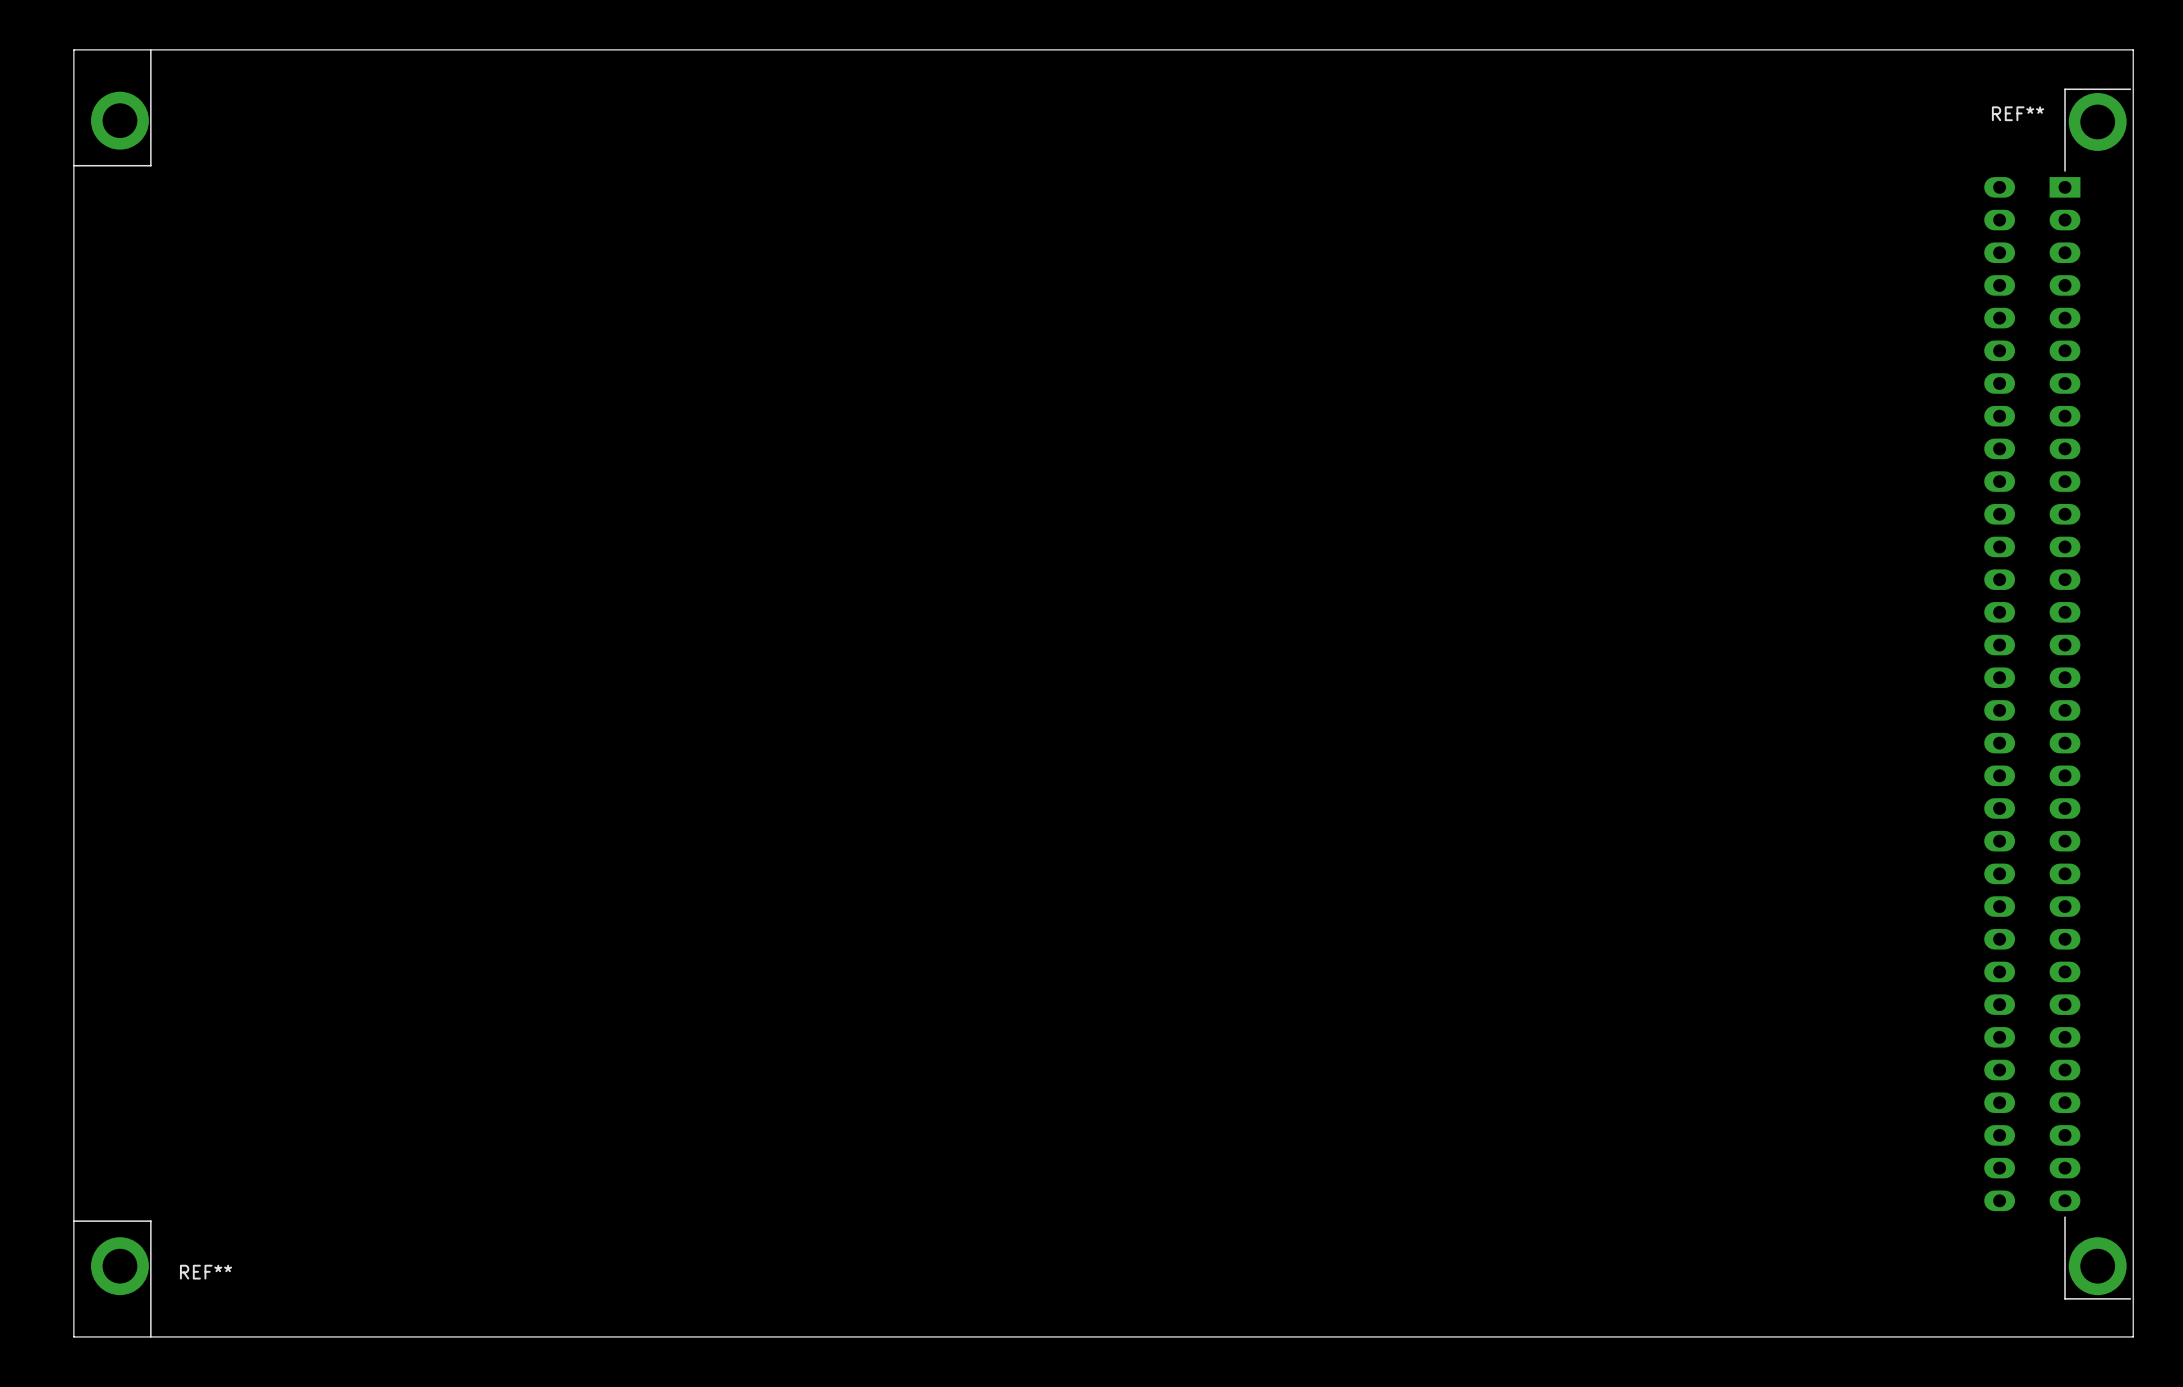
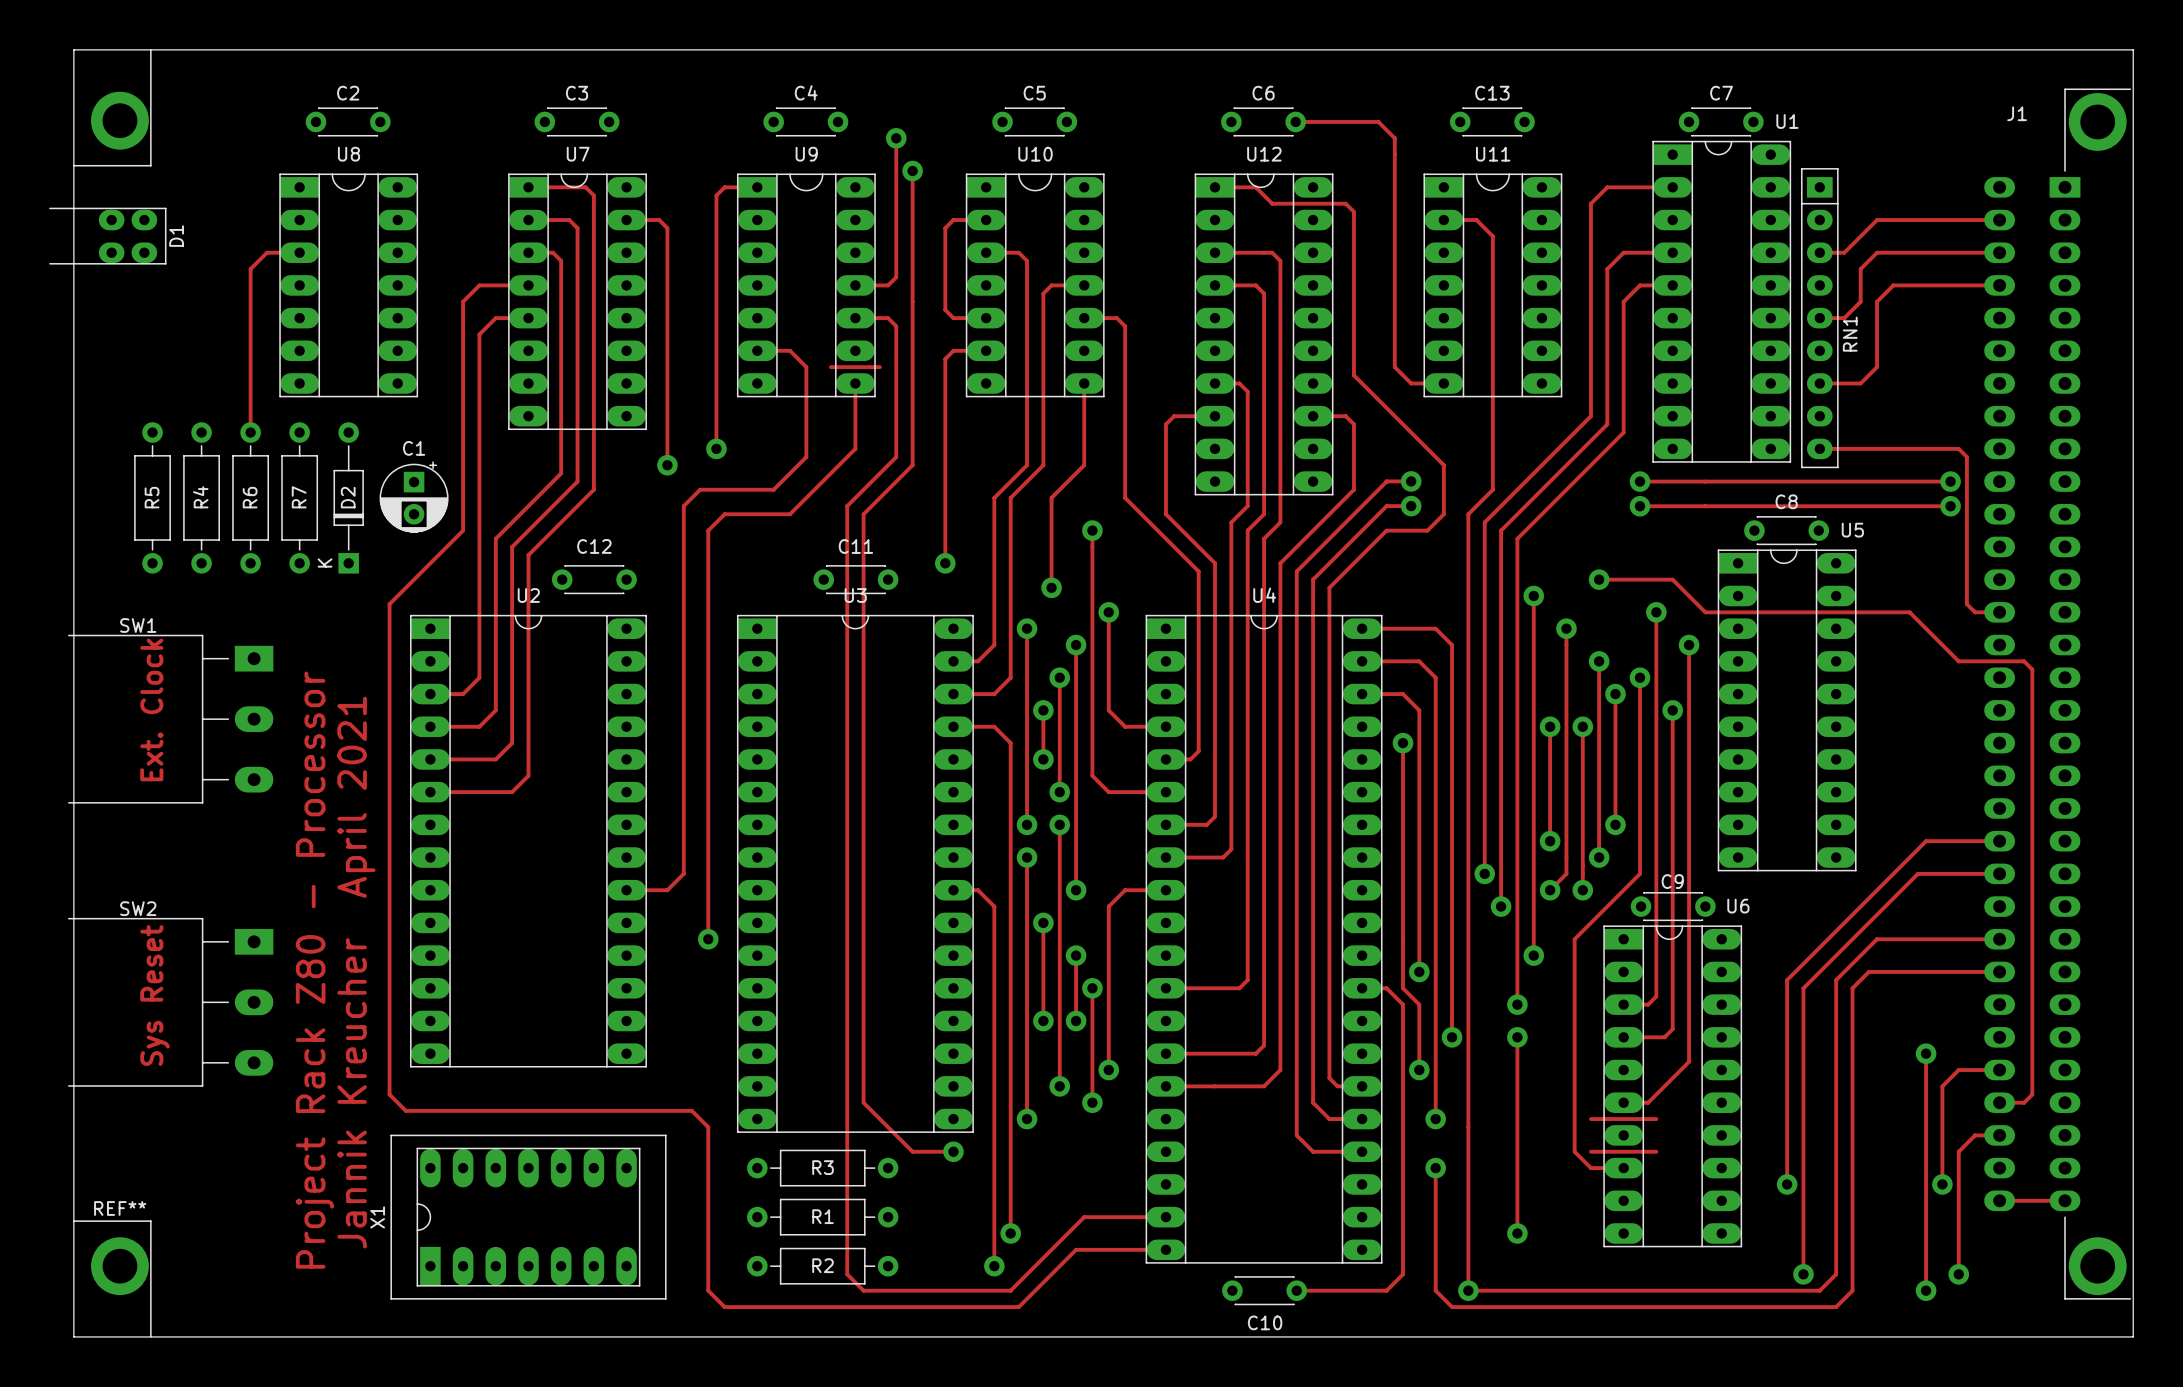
REF** name: REF** (2017, 113) -> J1 (2017, 113)
C2: none -> (348, 121)
C3: none -> (577, 121)
C4: none -> (805, 121)
C5: none -> (1034, 121)
C6: none -> (1263, 121)
track: none -> (1295, 121) (1378, 121) (1394, 138) (1394, 367) (1411, 383) (1443, 383)
C13: none -> (1492, 121)
C7: none -> (1721, 121)
track: none -> (896, 138) (896, 277) (888, 285) (855, 285)
via: none -> (896, 138)
track: none -> (912, 171) (912, 465) (863, 514) (863, 1102) (912, 1151) (953, 1151)
via: none -> (912, 171)
track: none -> (528, 187) (585, 187) (593, 195) (593, 489) (528, 555) (528, 775) (512, 792) (430, 792)
track: none -> (757, 187) (724, 187) (716, 195) (716, 448)
track: none -> (1215, 187) (1255, 187) (1272, 203) (1345, 203) (1353, 211) (1353, 375) (1443, 465) (1443, 514) (1427, 530) (1386, 530) (1329, 587) (1329, 1078) (1337, 1086) (1362, 1086)
track: none -> (1672, 187) (1607, 187) (1590, 203) (1590, 416) (1484, 522) (1484, 873)
track: none -> (528, 220) (569, 220) (577, 228) (577, 481) (512, 546) (512, 743) (495, 759) (430, 759)
track: none -> (626, 220) (659, 220) (667, 228) (667, 465)
track: none -> (986, 220) (953, 220) (945, 228) (945, 309) (953, 318) (986, 318)
track: none -> (1443, 220) (1476, 220) (1492, 236) (1492, 489) (1468, 514) (1468, 1290) (1819, 1290) (1836, 1274) (1836, 980) (1877, 939) (1999, 939)
track: none -> (1999, 220) (1877, 220) (1844, 252) (1819, 252)
D1: none -> (107, 236)
track: none -> (299, 252) (266, 252) (250, 269) (250, 432)
track: none -> (528, 252) (553, 252) (561, 260) (561, 473) (495, 538) (495, 710) (479, 726) (430, 726)
track: none -> (986, 252) (1018, 252) (1027, 260) (1027, 465) (994, 497) (994, 645) (978, 661) (953, 661)
track: none -> (1215, 252) (1272, 252) (1280, 260) (1280, 522) (1264, 538) (1264, 1045) (1255, 1053) (1165, 1053)
track: none -> (1672, 252) (1623, 252) (1607, 269) (1607, 424) (1501, 530) (1501, 906)
track: none -> (1999, 252) (1877, 252) (1860, 269) (1860, 301) (1844, 318) (1811, 318)
U8: none -> (348, 285)
track: none -> (528, 285) (479, 285) (463, 301) (463, 530) (389, 604) (389, 1094) (405, 1110) (691, 1110) (708, 1127) (708, 1290) (724, 1307) (1018, 1307) (1076, 1249) (1165, 1249)
U9: none -> (806, 285)
U10: none -> (1035, 285)
track: none -> (1084, 285) (1051, 285) (1043, 293) (1043, 465) (1010, 497) (1010, 677) (994, 694) (953, 694)
track: none -> (1215, 285) (1255, 285) (1264, 293) (1264, 514) (1247, 530) (1247, 980) (1239, 988) (1165, 988)
U11: none -> (1492, 285)
track: none -> (1672, 285) (1640, 285) (1623, 301) (1623, 432) (1517, 538) (1517, 1004)
track: none -> (1999, 285) (1893, 285) (1877, 301) (1877, 367) (1860, 383) (1819, 383)
U7: none -> (577, 301)
U1: none -> (1721, 301)
track: none -> (528, 318) (495, 318) (479, 334) (479, 677) (463, 694) (430, 694)
track: none -> (855, 318) (888, 318) (896, 326) (896, 457) (847, 506) (847, 1274) (863, 1290) (1010, 1290) (1084, 1217) (1165, 1217)
track: none -> (1084, 318) (1116, 318) (1125, 326) (1125, 497) (1198, 571) (1198, 751) (1190, 759) (1165, 759)
RN1: none -> (1819, 318)
U12: none -> (1264, 334)
track: none -> (757, 350) (790, 350) (806, 367) (806, 457) (773, 489) (700, 489) (683, 506) (683, 873) (667, 890) (626, 890)
track: none -> (986, 350) (953, 350) (945, 358) (945, 563)
track: none -> (830, 367) (879, 367)
track: none -> (855, 383) (855, 448) (790, 514) (724, 514) (708, 530) (708, 939)
track: none -> (1084, 383) (1084, 465) (1051, 497) (1051, 587)
track: none -> (1215, 383) (1239, 383) (1247, 391) (1247, 506) (1231, 522) (1231, 849) (1223, 857) (1165, 857)
track: none -> (1215, 416) (1174, 416) (1165, 424) (1165, 514) (1215, 563) (1215, 816) (1206, 824) (1165, 824)
track: none -> (1313, 416) (1345, 416) (1353, 424) (1353, 489) (1280, 563) (1280, 1070) (1264, 1086) (1165, 1086)
via: none -> (716, 448)
track: none -> (1819, 448) (1958, 448) (1966, 457) (1966, 604) (1975, 612) (1999, 612)
via: none -> (667, 465)
track: none -> (1411, 481) (1386, 481) (1296, 571) (1296, 1135) (1313, 1151) (1362, 1151)
via: none -> (1411, 481)
track: none -> (1640, 481) (1950, 481)
via: none -> (1640, 481)
via: none -> (1950, 481)
C1: none -> (414, 496)
R5: none -> (152, 497)
R4: none -> (201, 497)
R6: none -> (250, 497)
R7: none -> (299, 497)
D2: none -> (348, 497)
track: none -> (1411, 506) (1386, 506) (1313, 579) (1313, 1102) (1329, 1119) (1362, 1119)
via: none -> (1411, 506)
track: none -> (1640, 506) (1950, 506)
via: none -> (1640, 506)
via: none -> (1950, 506)
track: none -> (1092, 530) (1092, 775) (1108, 792) (1165, 792)
via: none -> (1092, 530)
C8: none -> (1786, 530)
via: none -> (945, 563)
C12: none -> (594, 579)
C11: none -> (855, 579)
track: none -> (1599, 579) (1672, 579) (1705, 612) (1909, 612) (1958, 661) (2024, 661) (2032, 669) (2032, 1094) (2024, 1102) (1999, 1102)
via: none -> (1599, 579)
via: none -> (1051, 587)
track: none -> (1533, 595) (1533, 955)
via: none -> (1533, 595)
track: none -> (1108, 612) (1108, 710) (1125, 726) (1165, 726)
via: none -> (1108, 612)
track: none -> (1656, 612) (1656, 996) (1648, 1004) (1623, 1004)
via: none -> (1656, 612)
track: none -> (1027, 628) (1027, 824)
via: none -> (1027, 628)
track: none -> (1362, 628) (1435, 628) (1452, 645) (1452, 1037)
track: none -> (1566, 628) (1566, 873) (1550, 890)
via: none -> (1566, 628)
track: none -> (1076, 645) (1076, 890)
via: none -> (1076, 645)
track: none -> (1689, 645) (1689, 1061) (1648, 1102) (1623, 1102)
via: none -> (1689, 645)
track: none -> (1362, 661) (1419, 661) (1435, 677) (1435, 1119)
track: none -> (1599, 661) (1599, 857)
via: none -> (1599, 661)
track: none -> (1059, 677) (1059, 792)
via: none -> (1059, 677)
track: none -> (1640, 677) (1640, 873) (1574, 939) (1574, 1151) (1590, 1168) (1623, 1168)
via: none -> (1640, 677)
track: none -> (1362, 694) (1402, 694) (1419, 710) (1419, 971)
track: none -> (1615, 694) (1615, 824)
via: none -> (1615, 694)
text: none -> Ext. Clock (151, 709)
track: none -> (1043, 710) (1043, 759)
via: none -> (1043, 710)
track: none -> (1672, 710) (1672, 1029) (1664, 1037) (1623, 1037)
via: none -> (1672, 710)
U5: none -> (1787, 710)
SW1: none -> (170, 719)
track: none -> (953, 726) (994, 726) (1010, 743) (1010, 1233)
track: none -> (1550, 726) (1550, 841)
via: none -> (1550, 726)
track: none -> (1582, 726) (1582, 890)
via: none -> (1582, 726)
track: none -> (1402, 743) (1402, 988) (1419, 1004) (1419, 1070)
via: none -> (1402, 743)
via: none -> (1043, 759)
via: none -> (1059, 792)
via: none -> (1027, 824)
track: none -> (1059, 824) (1059, 1086)
via: none -> (1059, 824)
via: none -> (1615, 824)
U2: none -> (528, 841)
via: none -> (1550, 841)
track: none -> (1999, 841) (1926, 841) (1787, 980) (1787, 1184)
track: none -> (1027, 857) (1027, 1119)
via: none -> (1027, 857)
via: none -> (1599, 857)
U3: none -> (855, 873)
via: none -> (1484, 873)
track: none -> (1999, 873) (1917, 873) (1803, 988) (1803, 1274)
track: none -> (953, 890) (978, 890) (994, 906) (994, 1266)
via: none -> (1076, 890)
track: none -> (1165, 890) (1125, 890) (1108, 906) (1108, 1070)
via: none -> (1550, 890)
via: none -> (1582, 890)
via: none -> (1501, 906)
C9: none -> (1673, 906)
track: none -> (1043, 922) (1043, 1020)
via: none -> (1043, 922)
via: none -> (708, 939)
U4: none -> (1264, 939)
track: none -> (1076, 955) (1076, 1020)
via: none -> (1076, 955)
via: none -> (1533, 955)
text: none -> Project Rack Z80 - Processor (314, 970)
via: none -> (1419, 971)
track: none -> (1999, 971) (1868, 971) (1852, 988) (1852, 1290) (1836, 1307) (1452, 1307) (1435, 1290) (1435, 1168)
text: none -> Jannik Kreucher April 2021 (356, 972)
track: none -> (1092, 988) (1092, 1102)
via: none -> (1092, 988)
track: none -> (1362, 988) (1386, 988) (1402, 1004) (1402, 1274) (1386, 1290) (1296, 1290)
text: none -> Sys Reset (155, 995)
SW2: none -> (170, 1002)
via: none -> (1517, 1004)
via: none -> (1043, 1020)
via: none -> (1076, 1020)
via: none -> (1452, 1037)
track: none -> (1517, 1037) (1517, 1233)
via: none -> (1517, 1037)
track: none -> (1926, 1053) (1926, 1290)
via: none -> (1926, 1053)
via: none -> (1108, 1070)
via: none -> (1419, 1070)
track: none -> (1999, 1070) (1958, 1070) (1942, 1086) (1942, 1184)
via: none -> (1059, 1086)
U6: none -> (1672, 1086)
via: none -> (1092, 1102)
via: none -> (1027, 1119)
via: none -> (1435, 1119)
track: none -> (1590, 1119) (1656, 1119)
track: none -> (1999, 1135) (1975, 1135) (1958, 1151) (1958, 1274)
via: none -> (953, 1151)
track: none -> (1590, 1151) (1656, 1151)
R3: none -> (822, 1168)
via: none -> (1435, 1168)
via: none -> (1787, 1184)
via: none -> (1942, 1184)
track: none -> (1999, 1200) (2065, 1200)
X1: none -> (528, 1217)
R1: none -> (822, 1217)
via: none -> (1010, 1233)
via: none -> (1517, 1233)
R2: none -> (822, 1266)
via: none -> (994, 1266)
REF** name position: REF** (206, 1272) -> REF** (120, 1208)
via: none -> (1803, 1274)
via: none -> (1958, 1274)
C10: none -> (1264, 1290)
via: none -> (1468, 1290)
via: none -> (1926, 1290)

